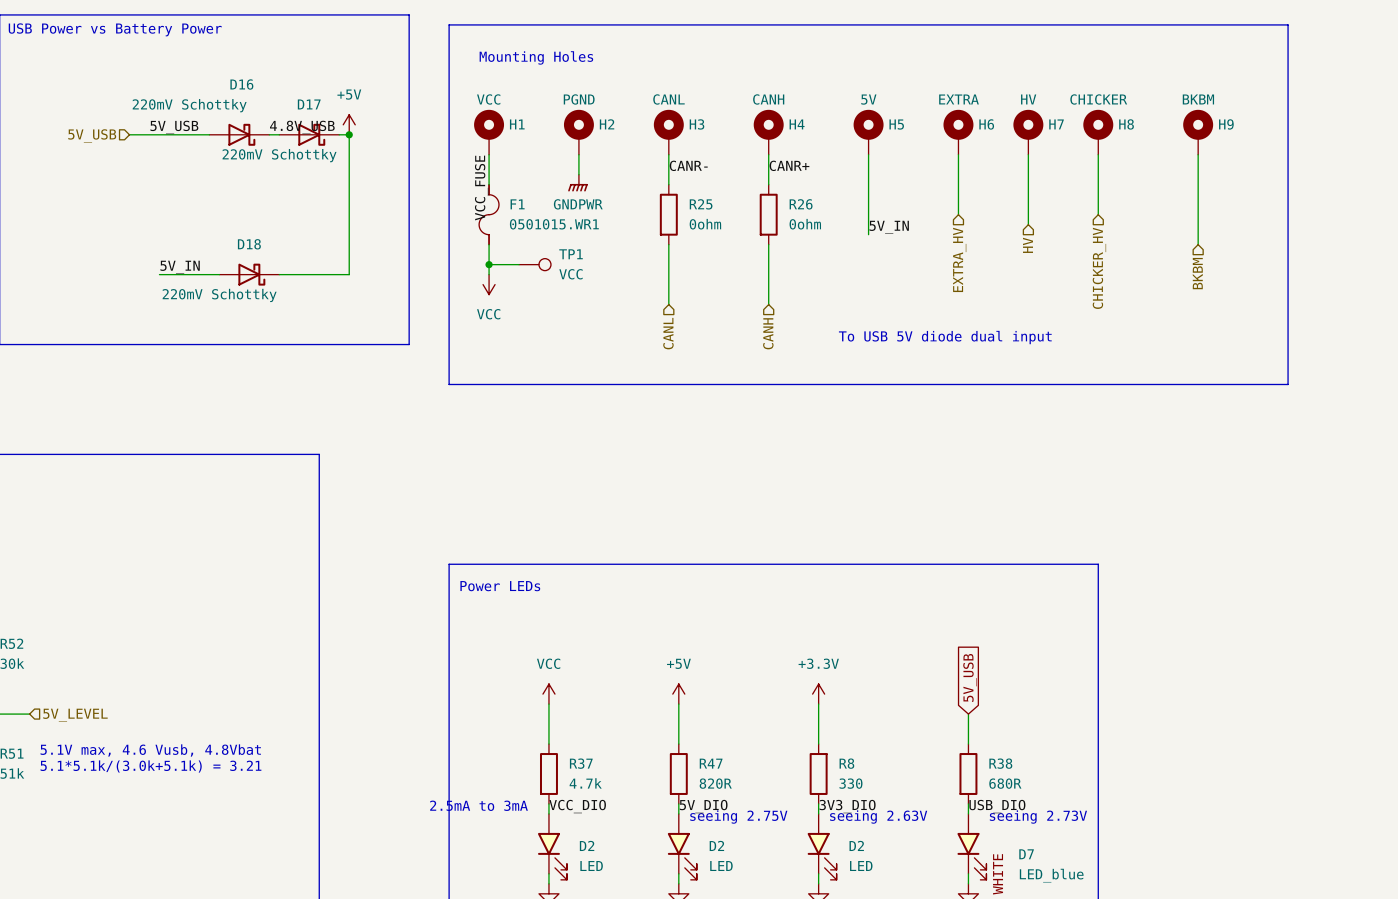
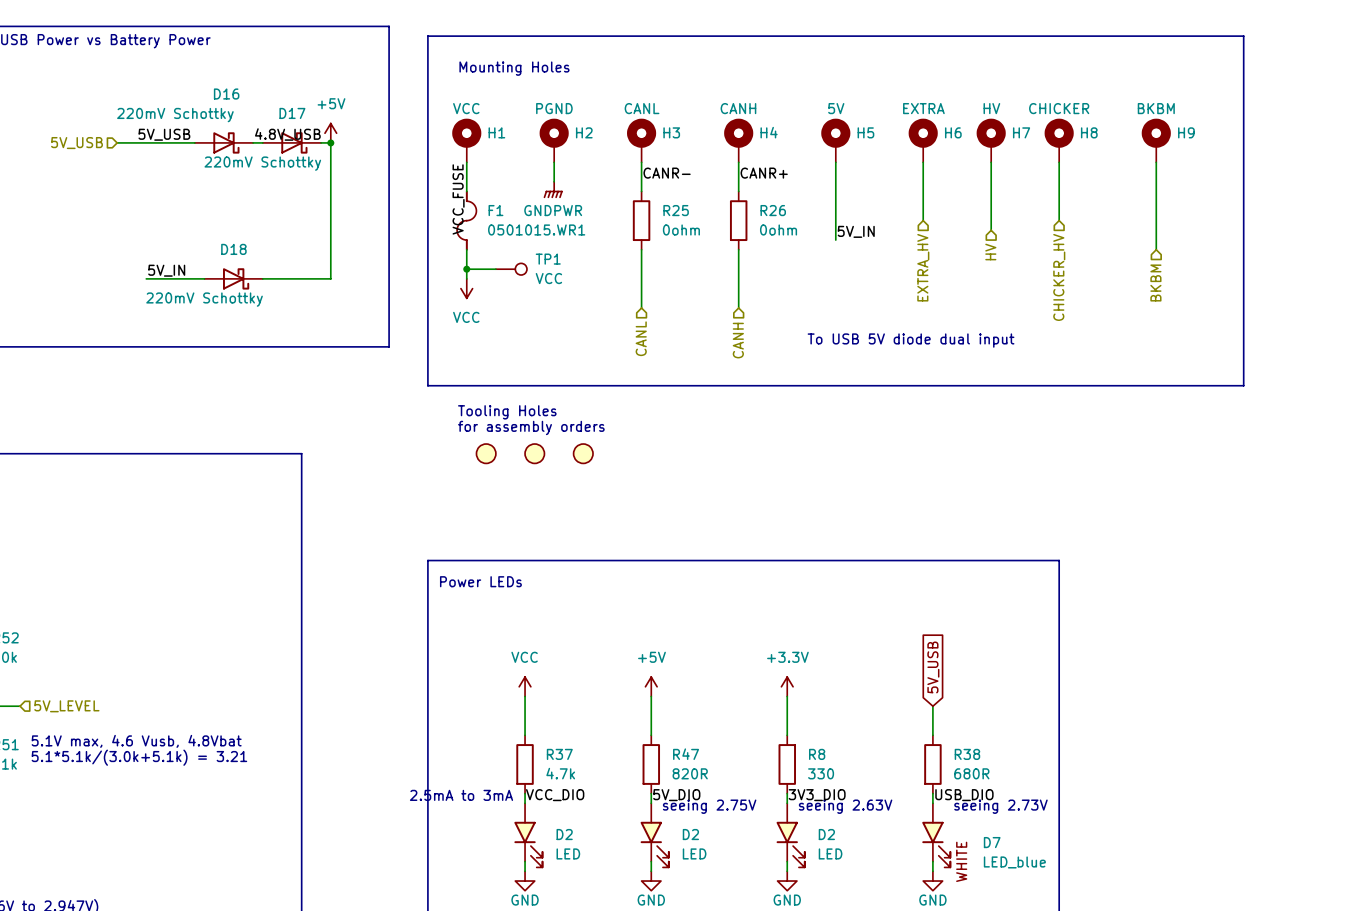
text: none -> Tooling Holes (507, 412)
text: none -> for assembly orders (531, 427)
part: none -> (486, 453)
part: none -> (534, 453)
part: none -> (583, 453)

